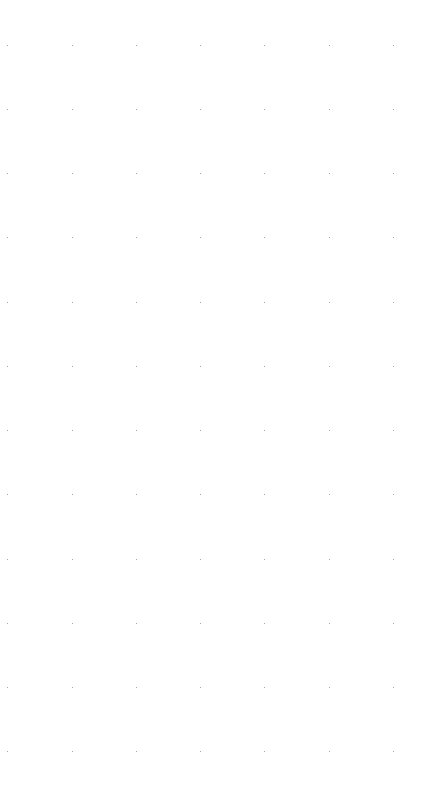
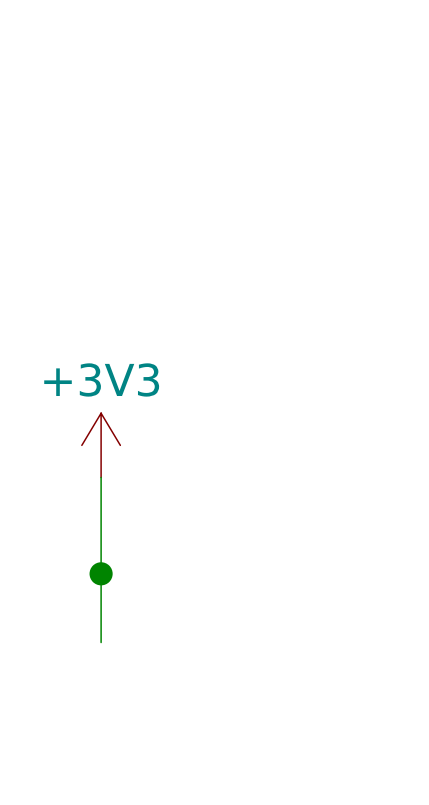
power symbol: none -> +3V3 (101, 445)
wire: none -> (101, 477) (101, 642)
junction: none -> (101, 573)

